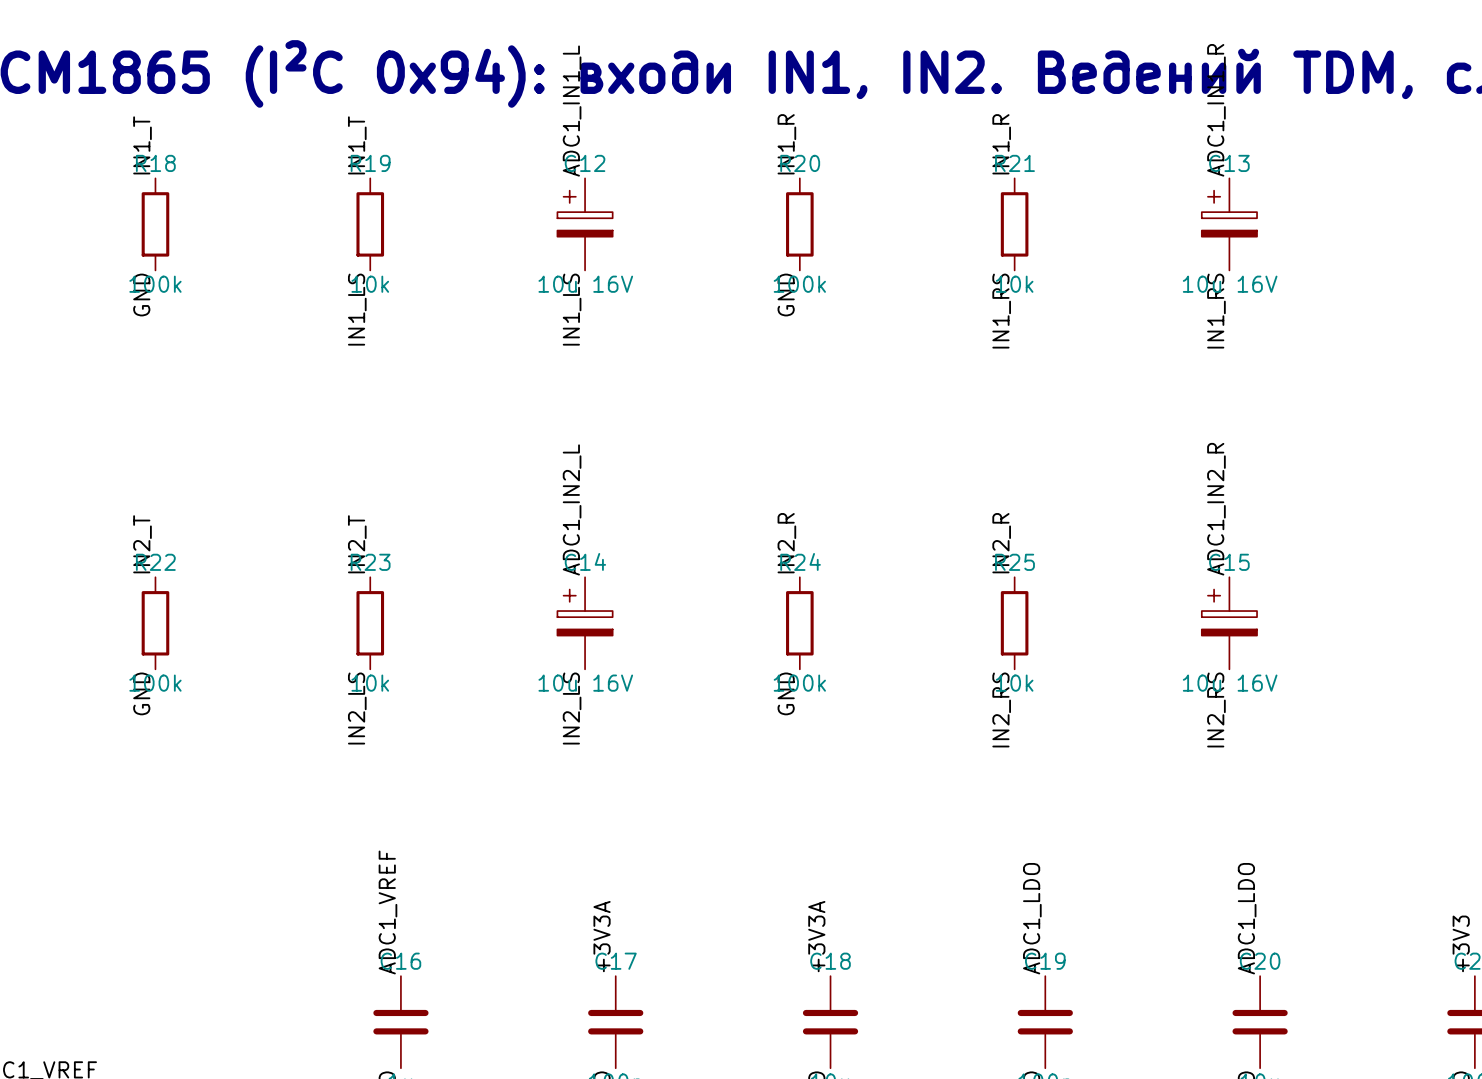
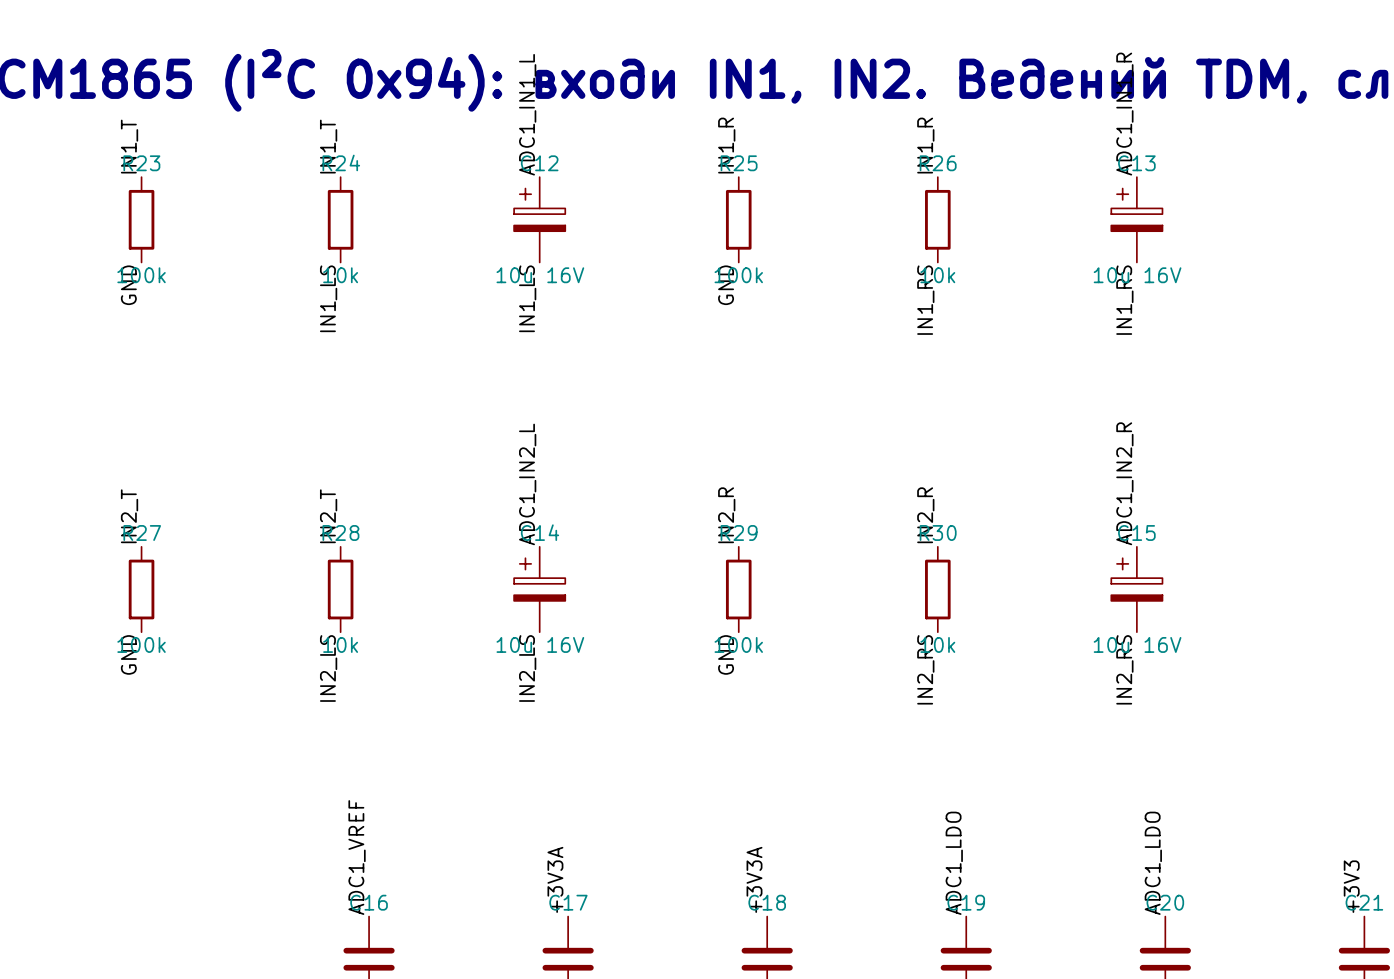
R18 name: R18 (155, 163) -> R23 (141, 163)
R19 name: R19 (370, 163) -> R24 (341, 162)
R20 name: R20 (800, 163) -> R25 (739, 163)
R21 name: R21 (1014, 163) -> R26 (938, 163)
R24 name: R24 (800, 561) -> R29 (739, 532)
R22 name: R22 (155, 562) -> R27 (142, 532)
R23 name: R23 (370, 562) -> R28 (340, 532)
R25 name: R25 (1014, 562) -> R30 (938, 532)

